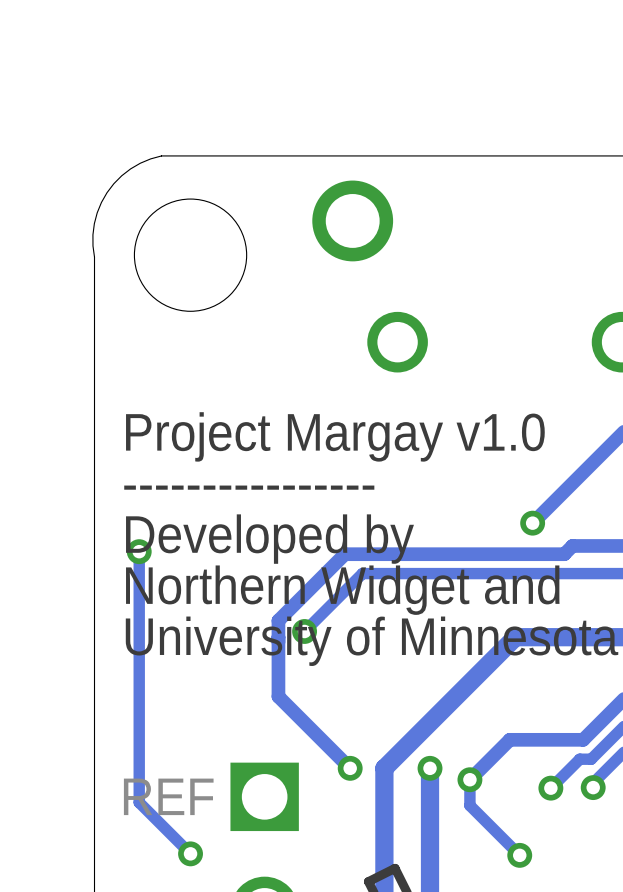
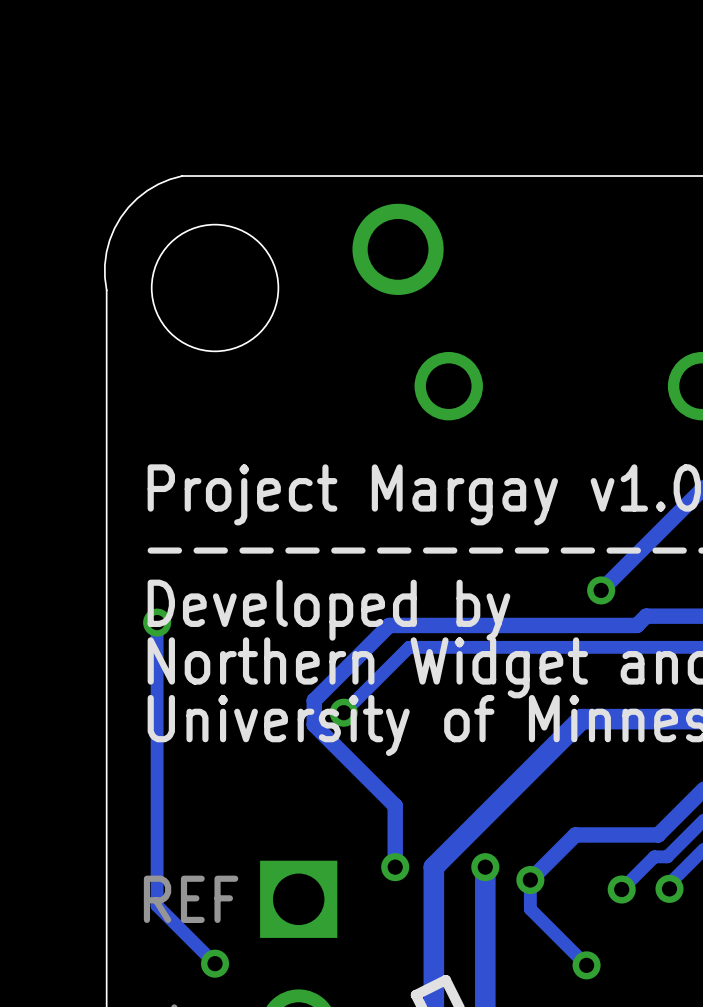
track: (278, 642) (278, 696) (350, 768) -> (314, 724) (395, 805) (395, 867)

